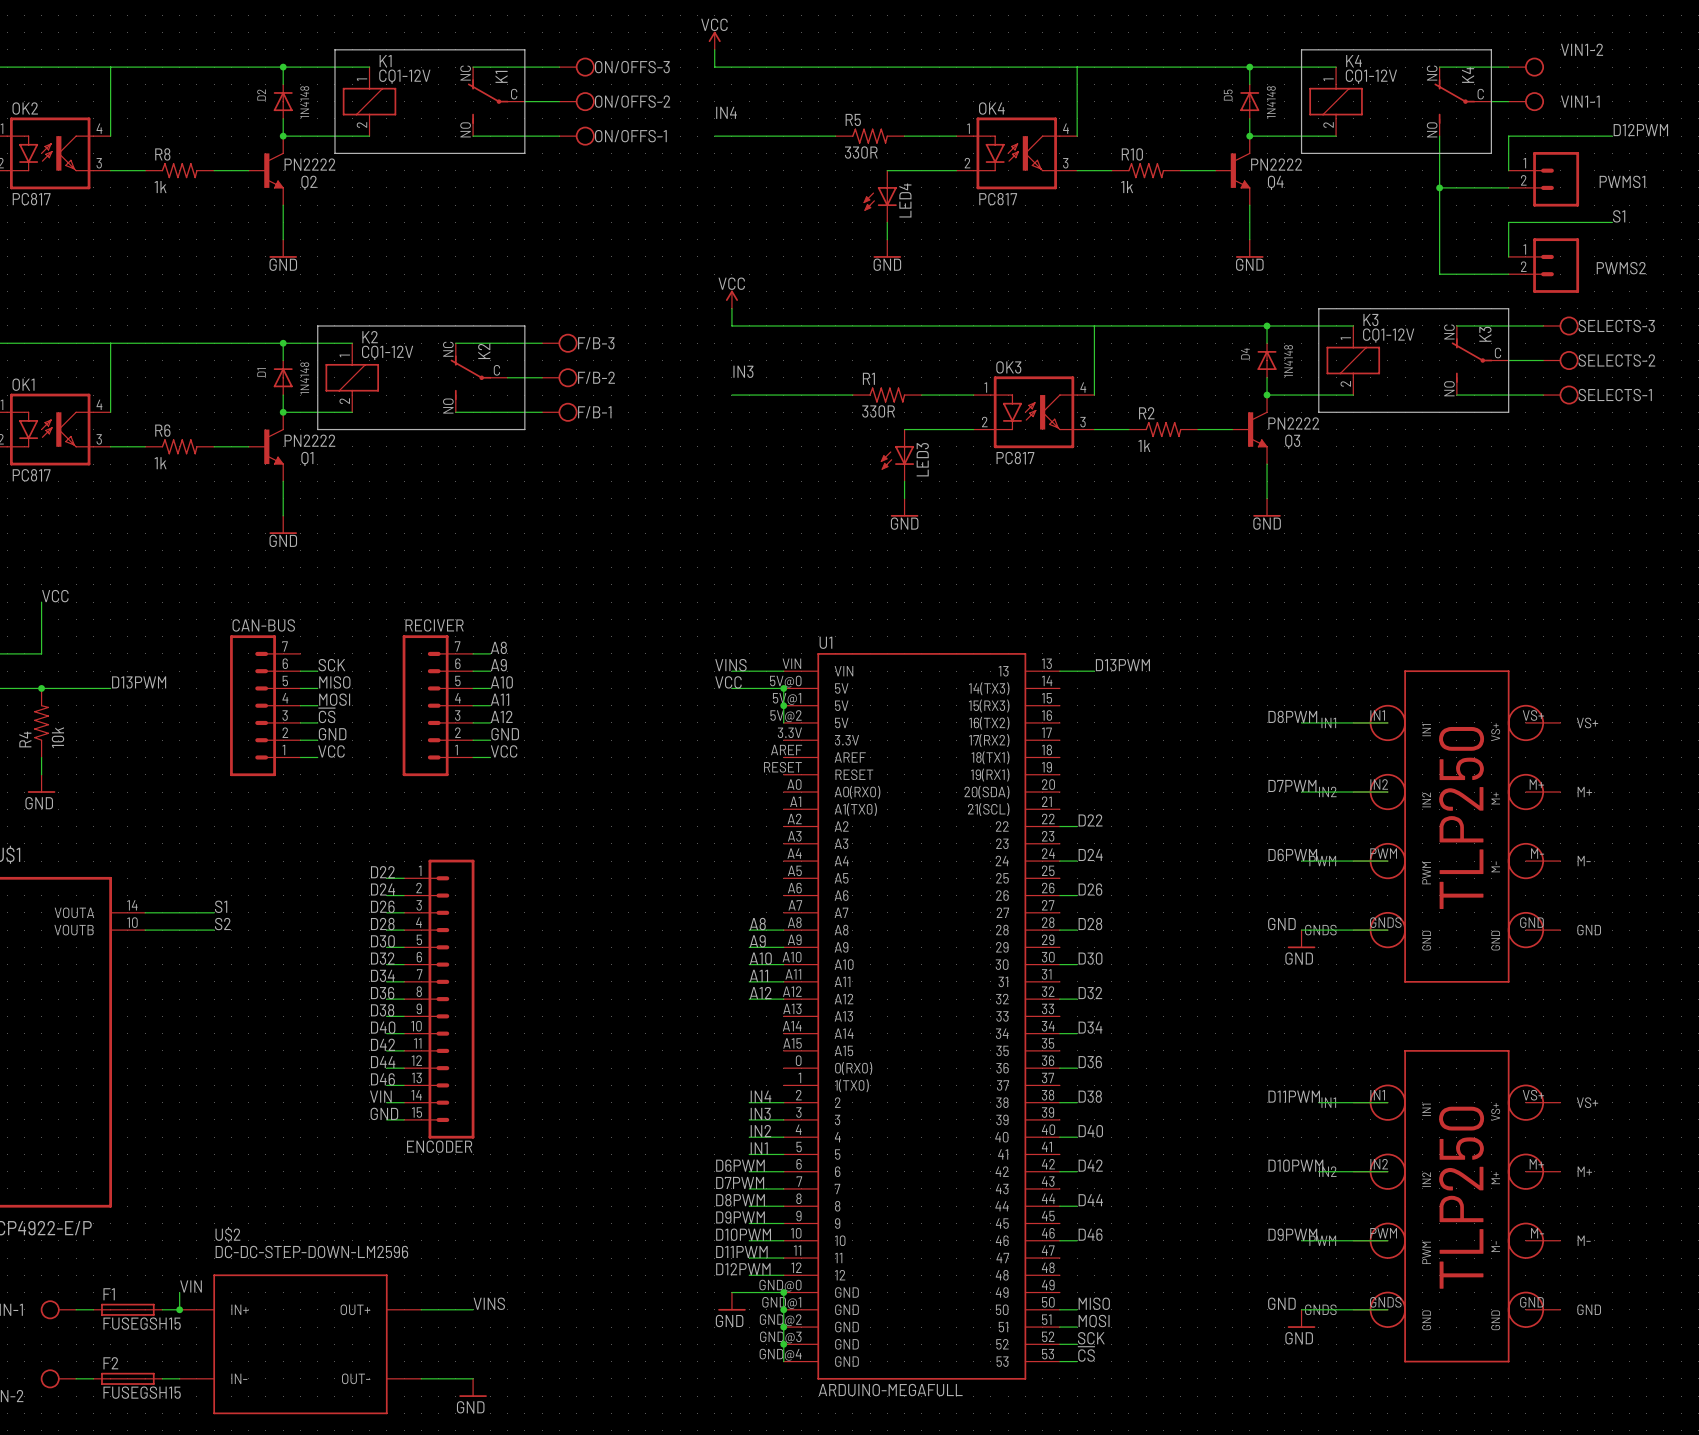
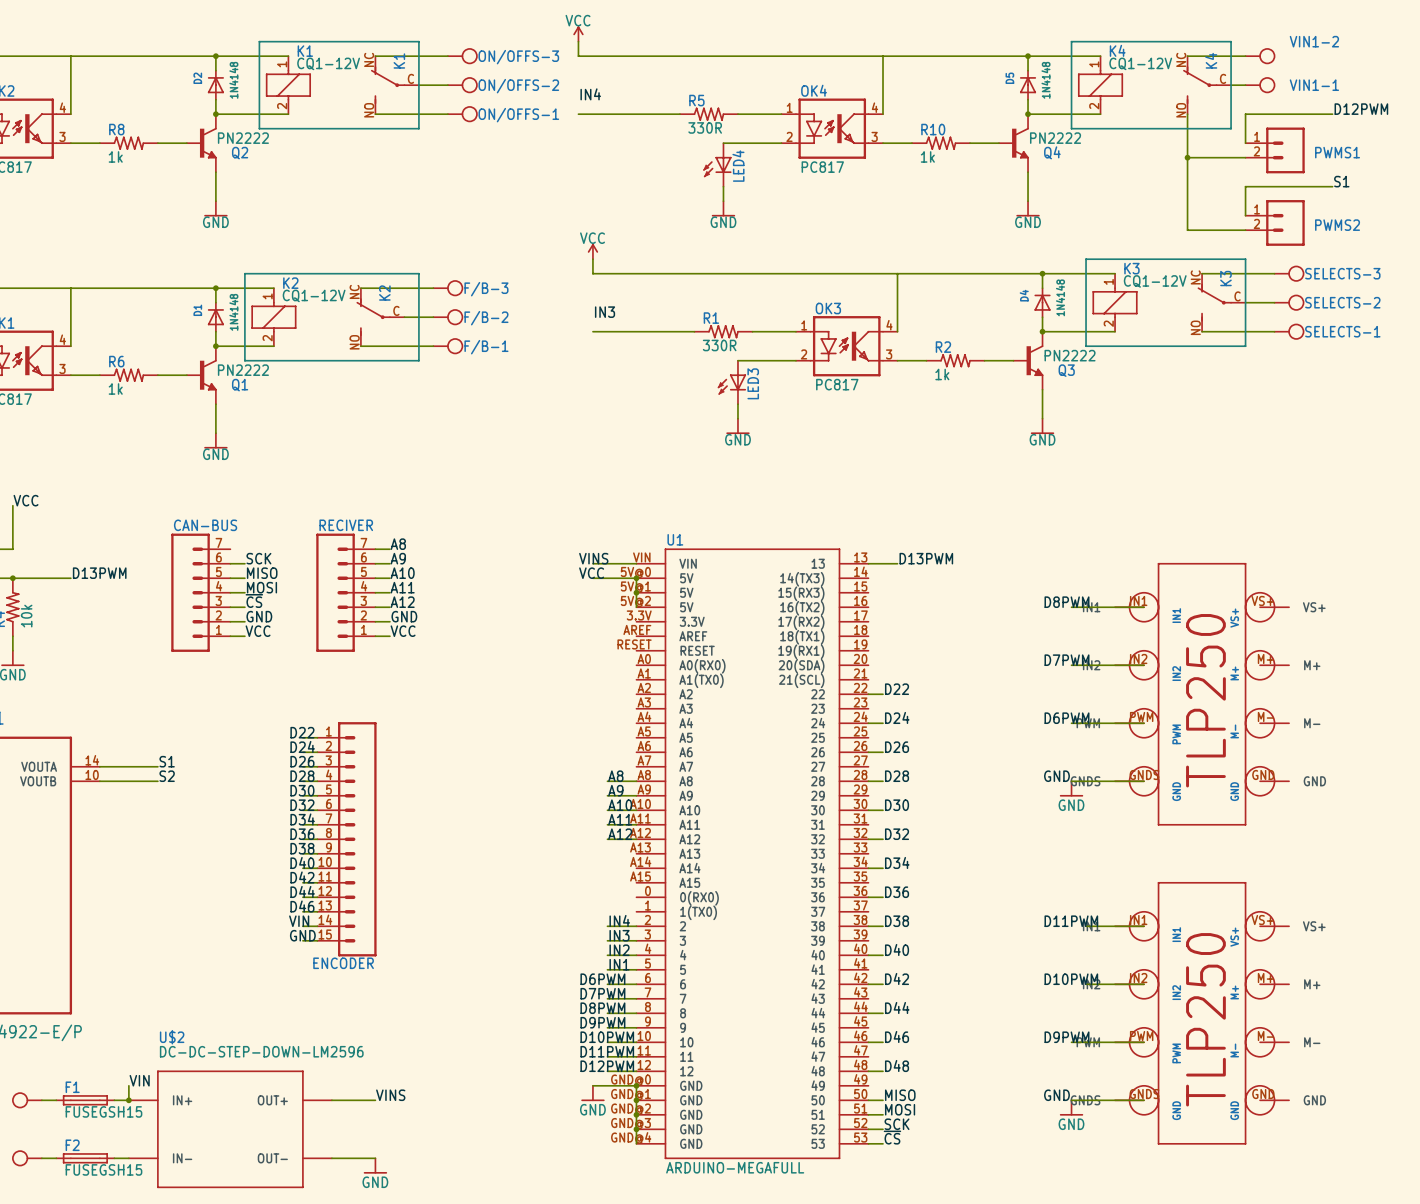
label: none -> D48 (897, 1066)
wire: none -> (868, 1071) (883, 1071)

